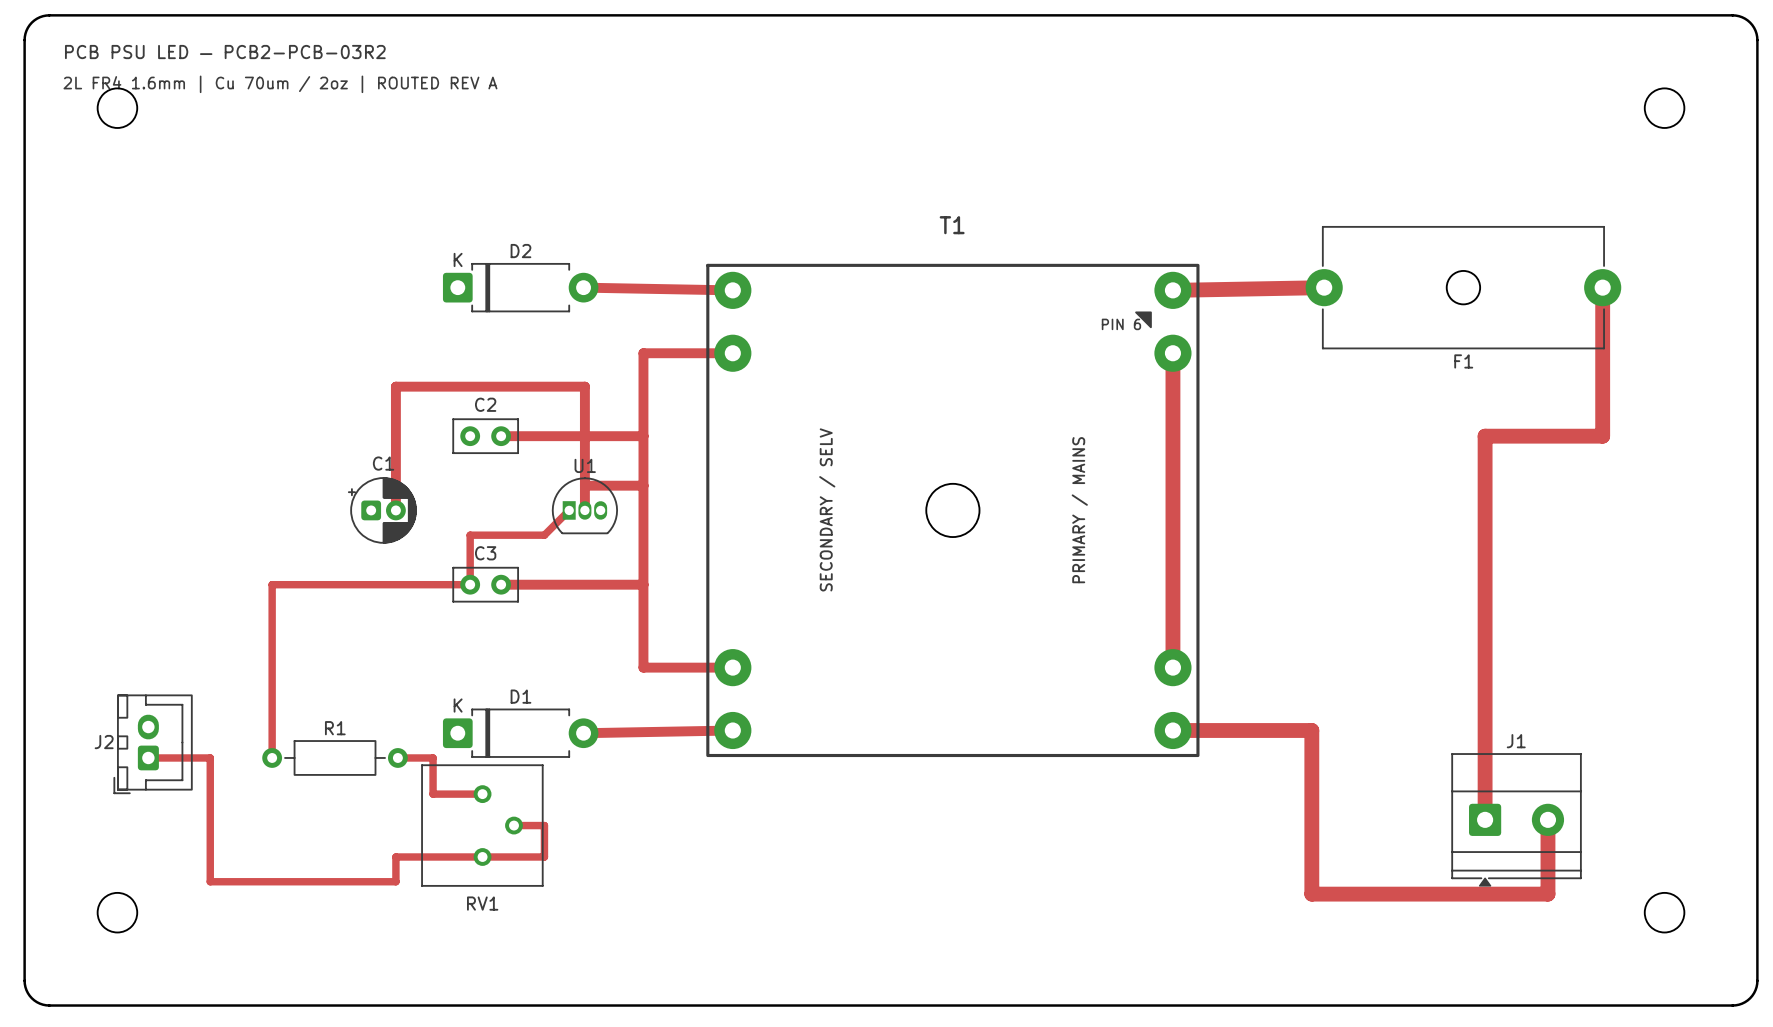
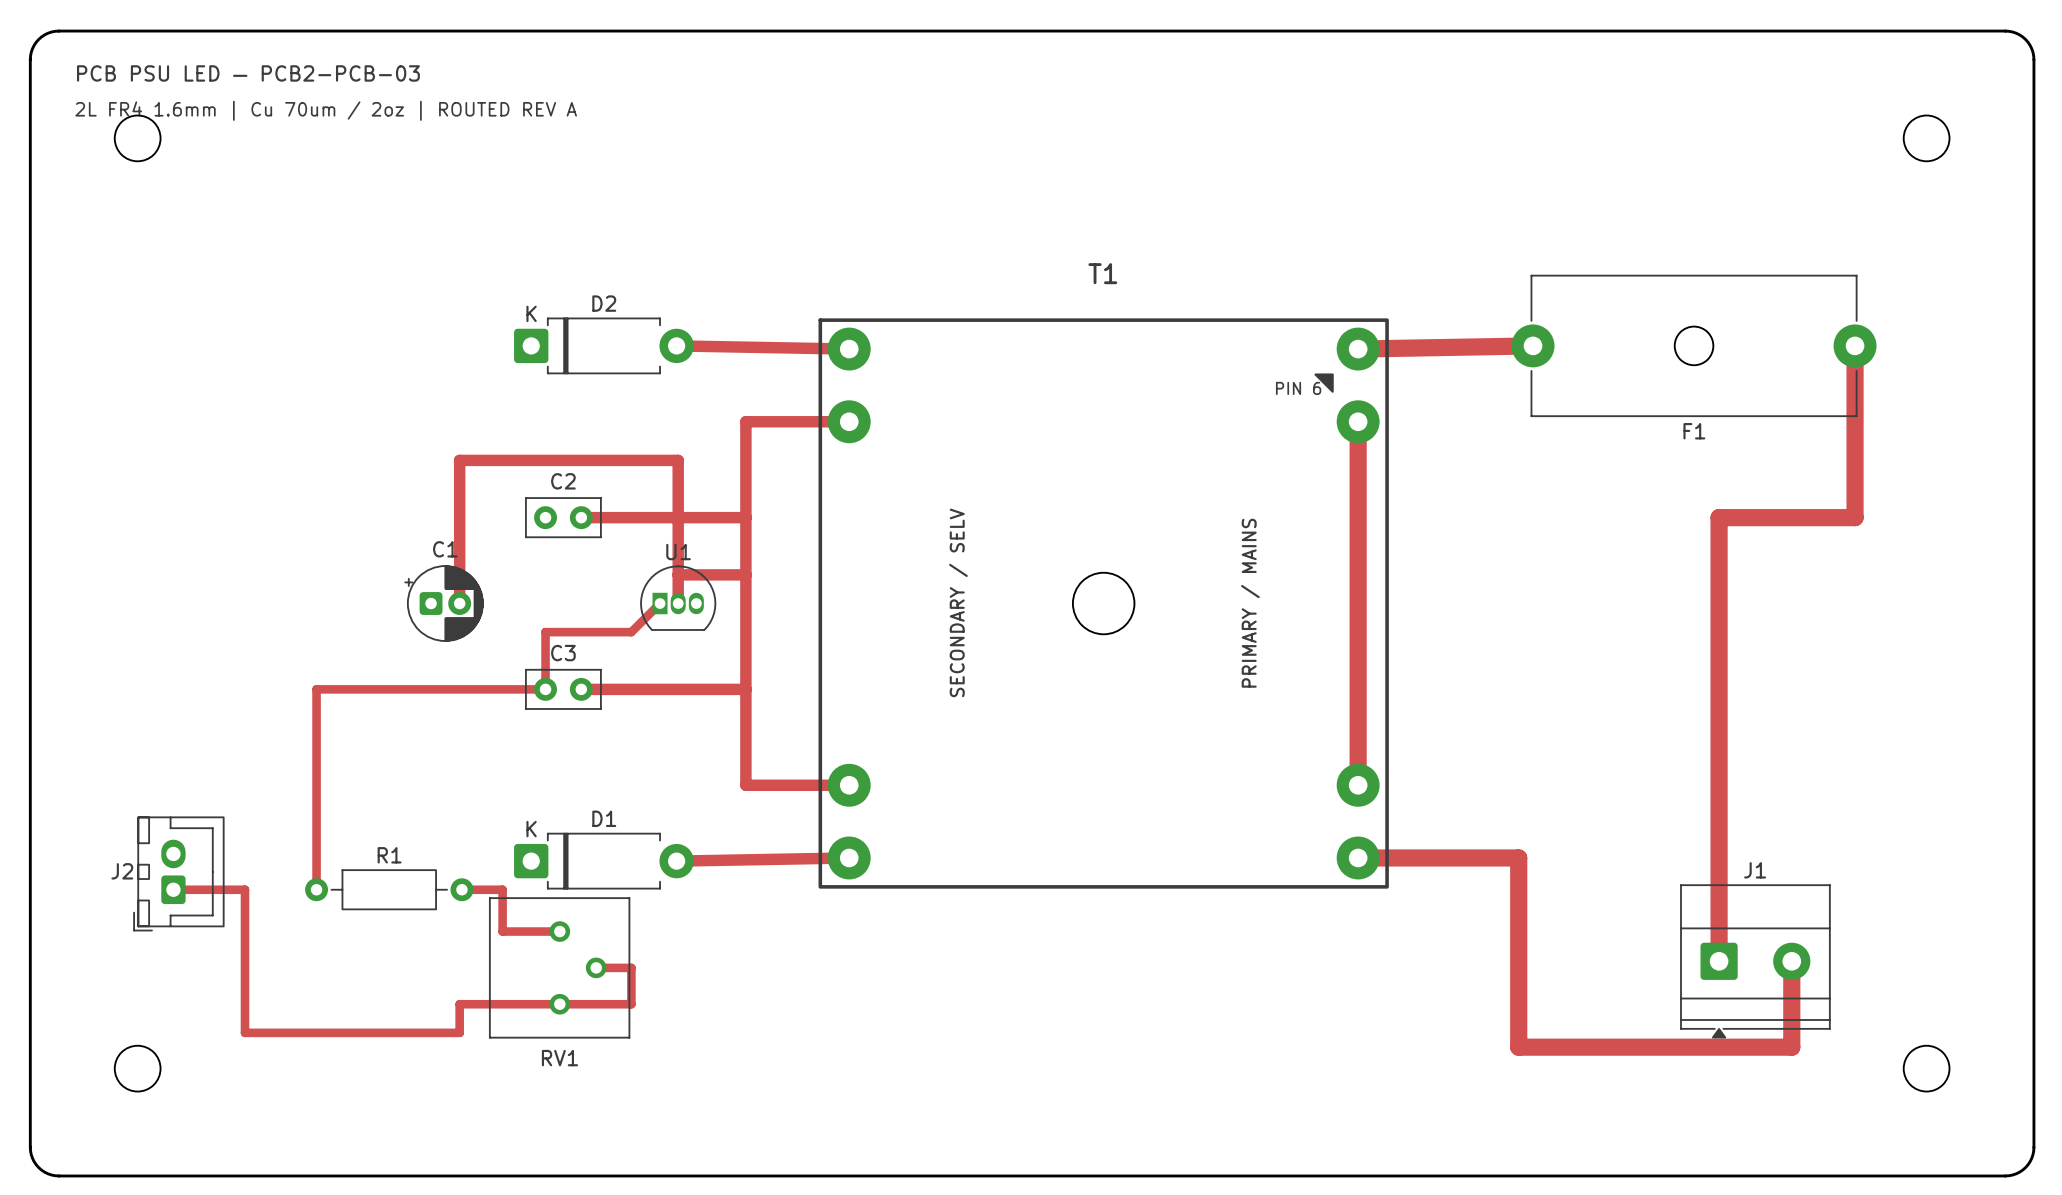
text: PCB PSU LED — PCB2-PCB-03R2 (225, 52) -> PCB PSU LED — PCB2-PCB-03 (248, 73)

